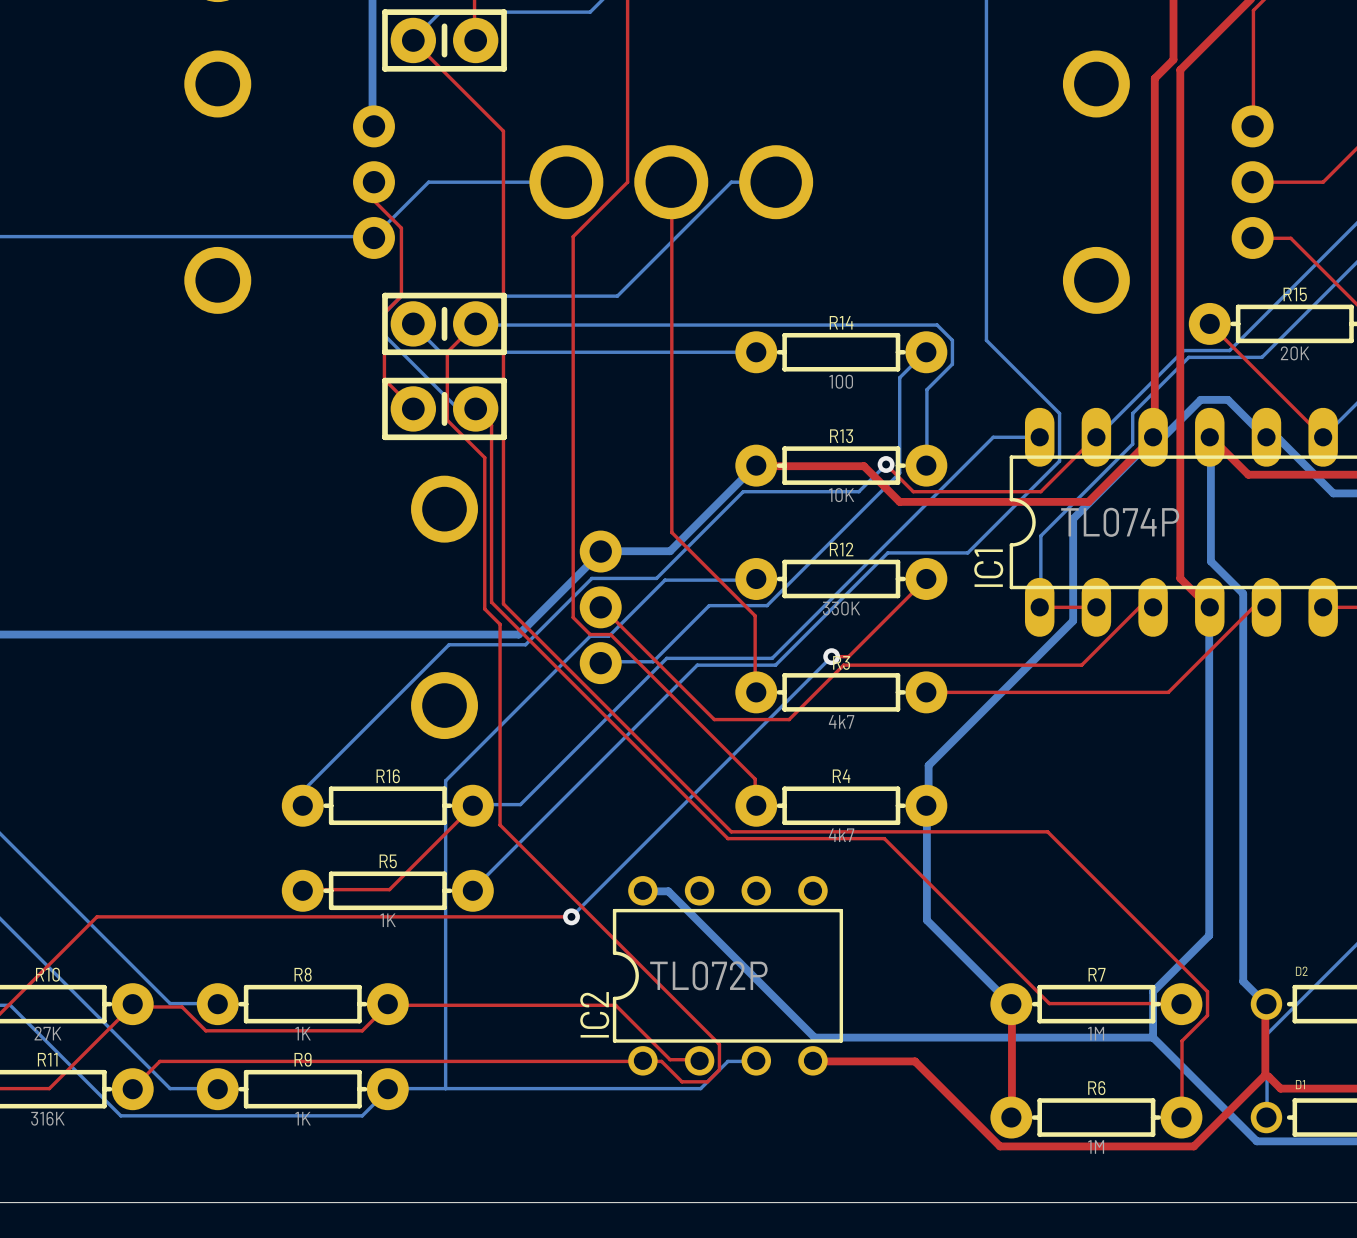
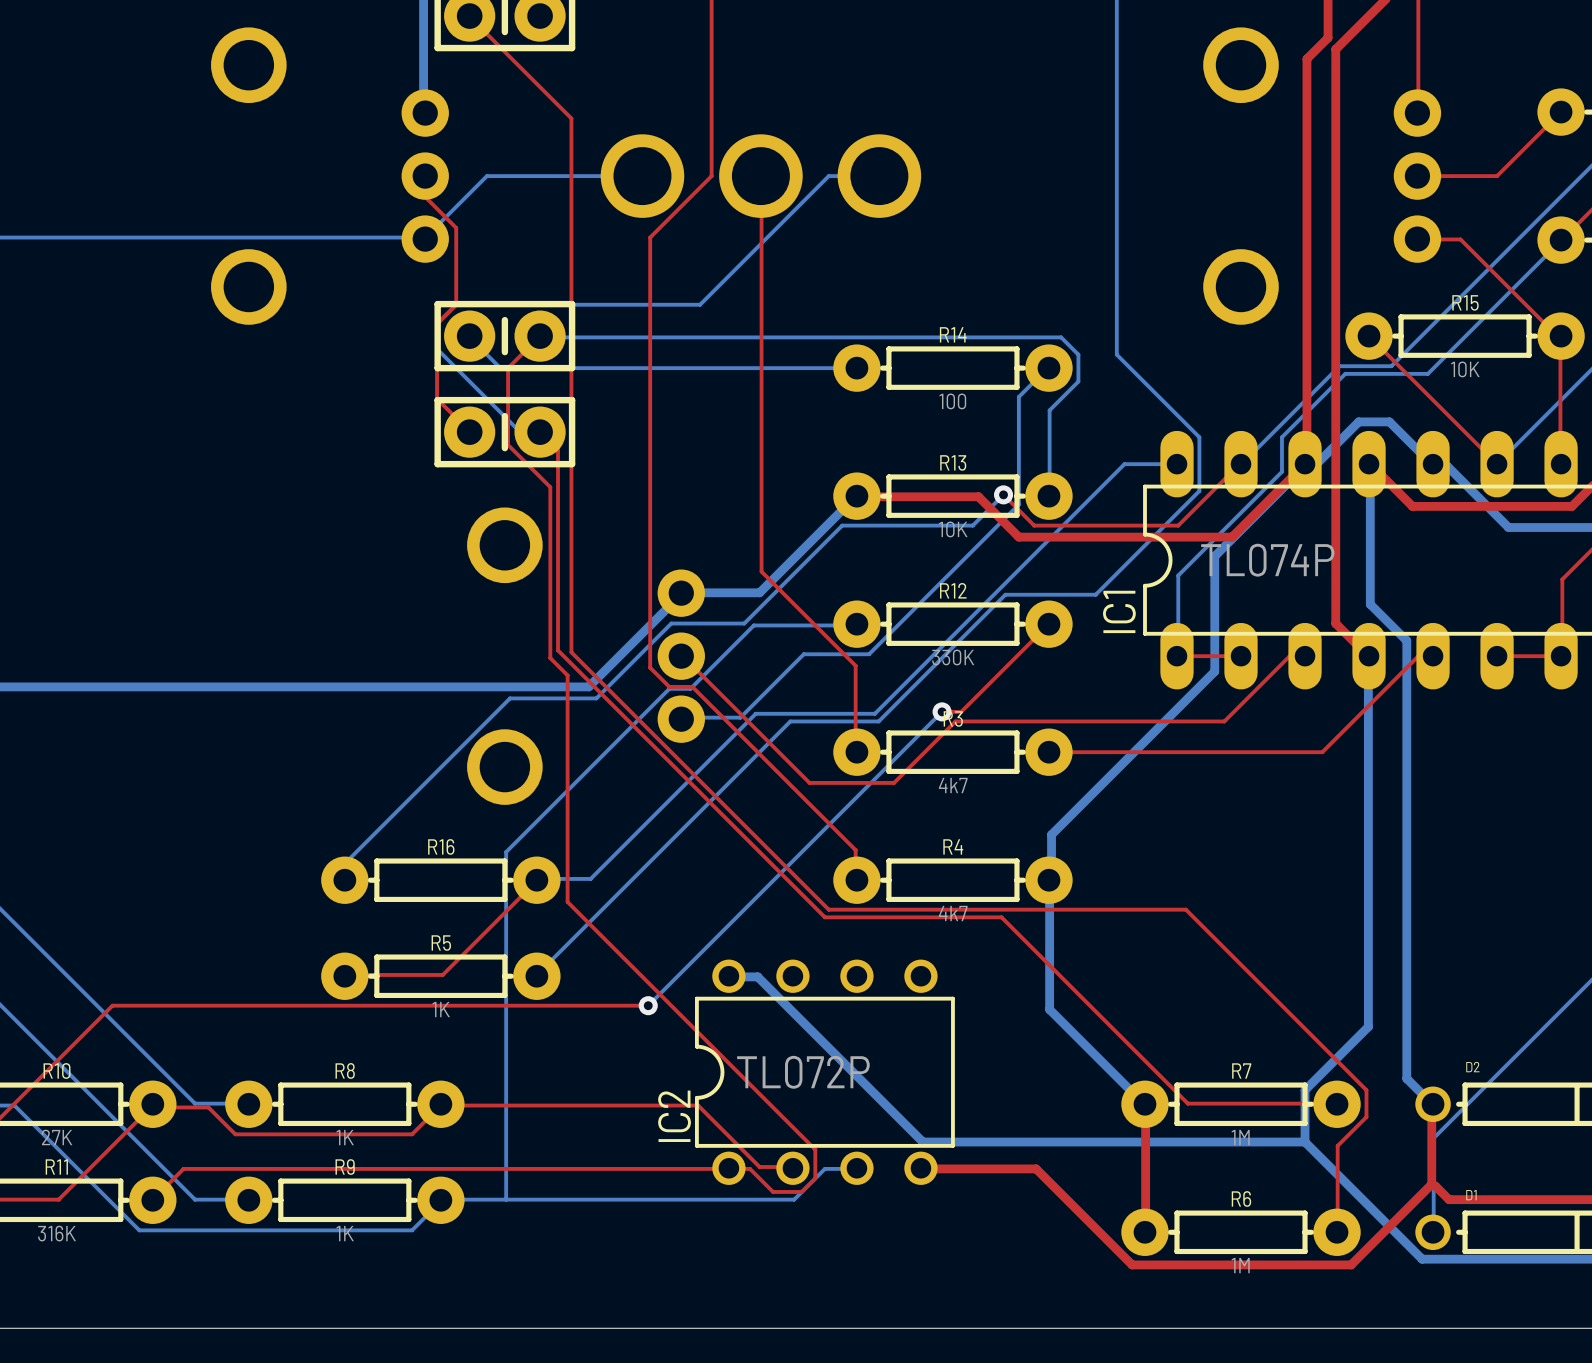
R15 value: 20K (1295, 353) -> 10K (1465, 369)

